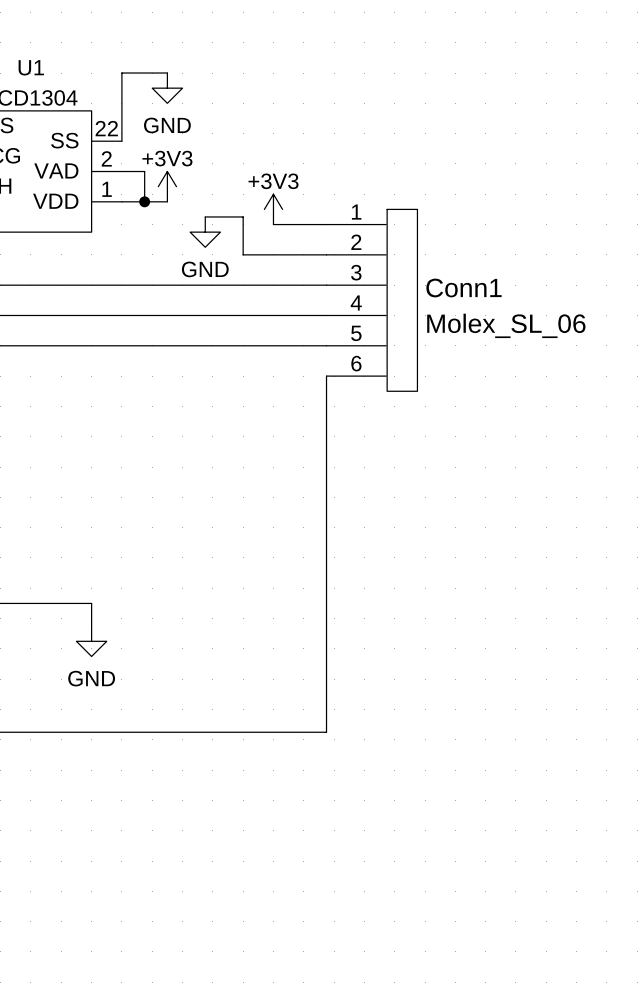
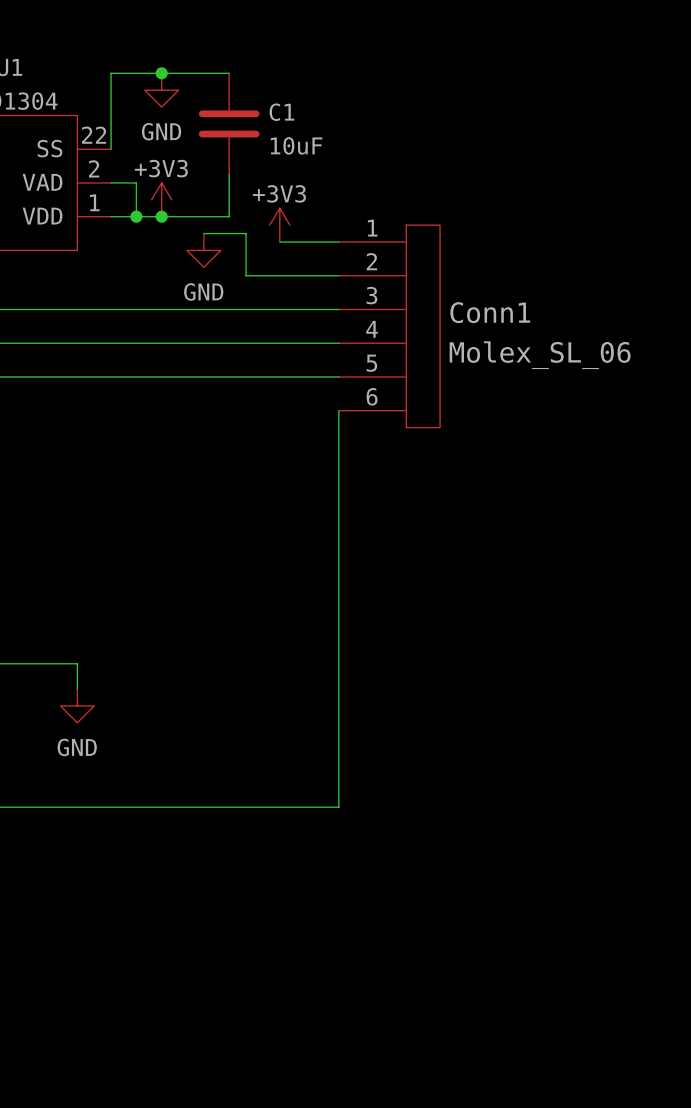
wire: none -> (161, 73) (229, 73)
junction: none -> (161, 73)
C1: none -> 10uF (229, 123)
wire: none -> (229, 174) (229, 216) (161, 216)
junction: none -> (161, 216)

